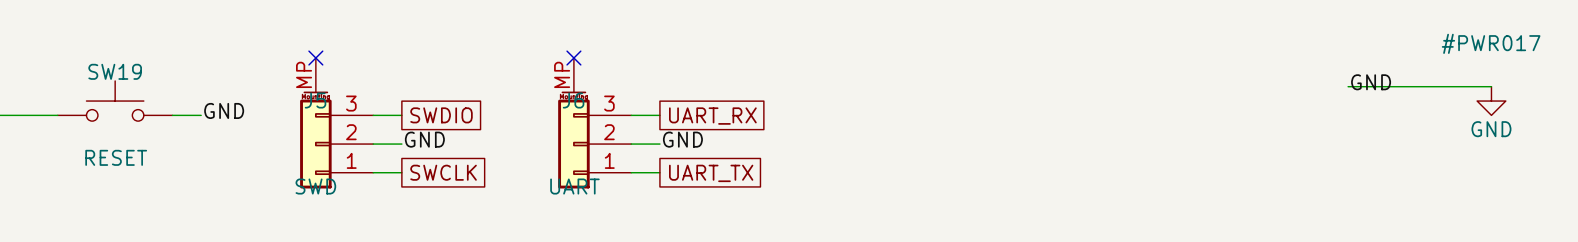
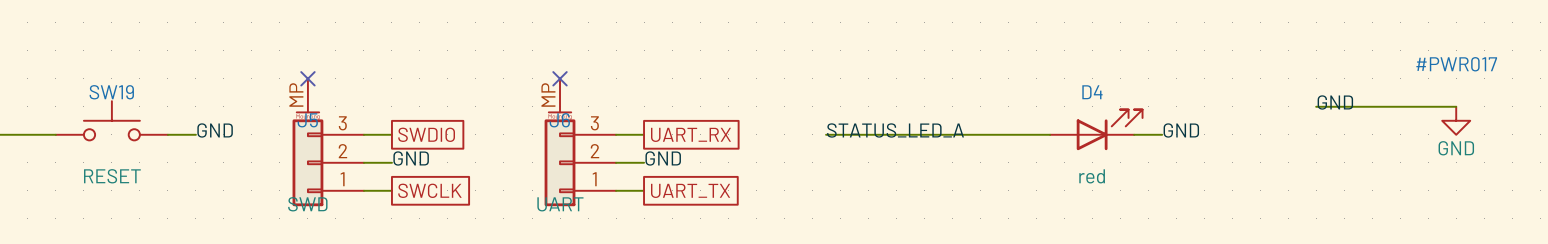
D4: none -> red (1096, 129)
label: none -> GND (1181, 130)
label: none -> STATUS_LED_A (895, 130)
wire: none -> (826, 134) (1050, 134)
wire: none -> (1134, 134) (1162, 134)

